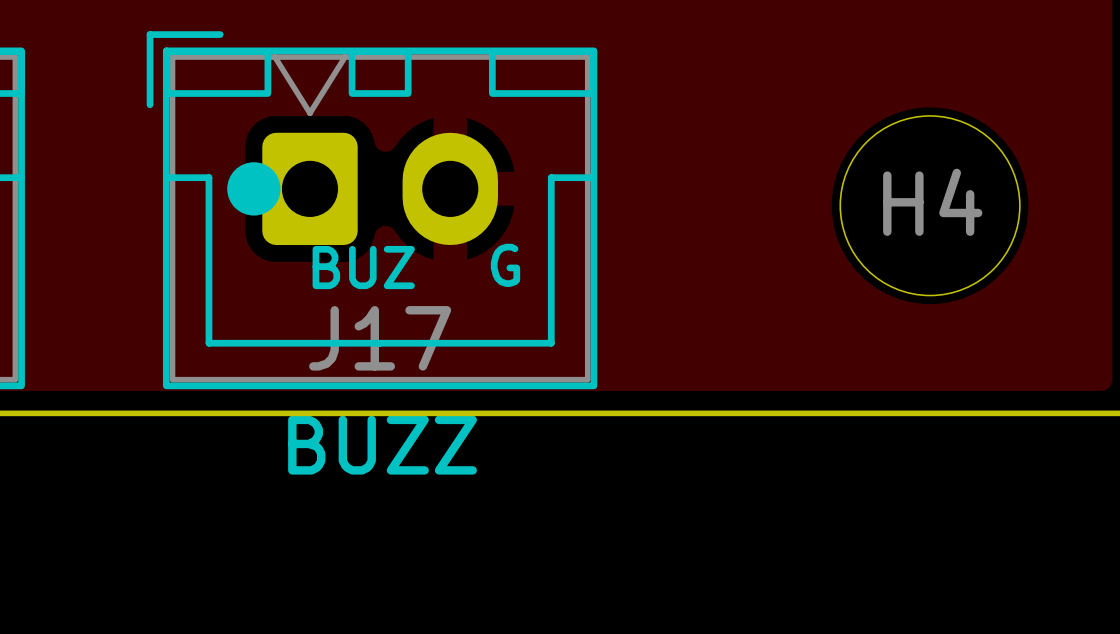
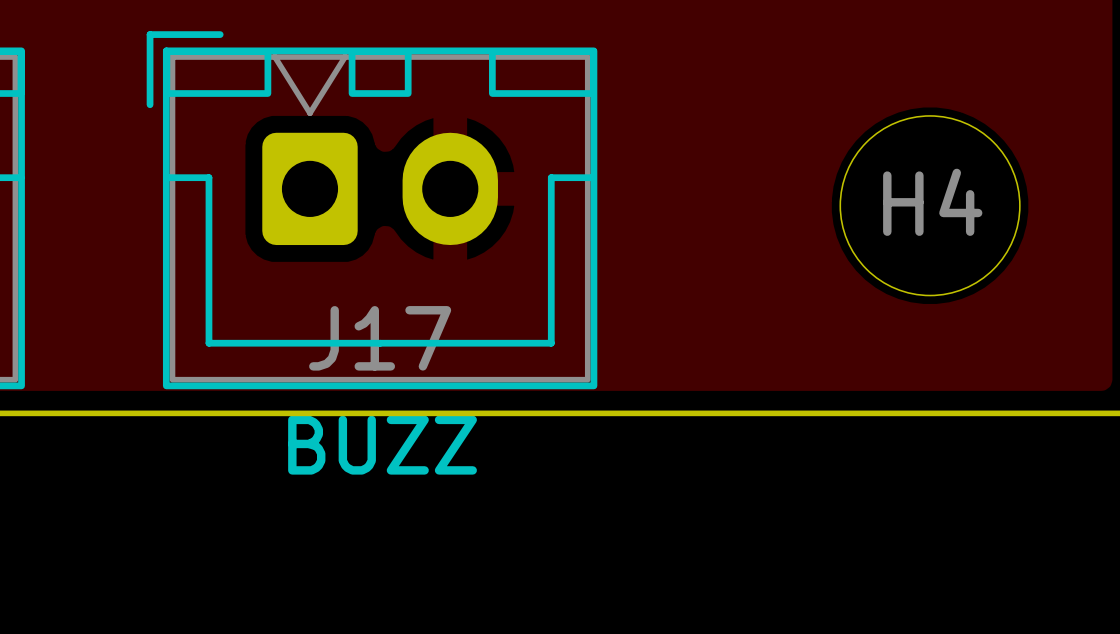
drawing: [227, 162, 281, 216] -> none
text: G (505, 265) -> none
text: BUZ (363, 267) -> none

